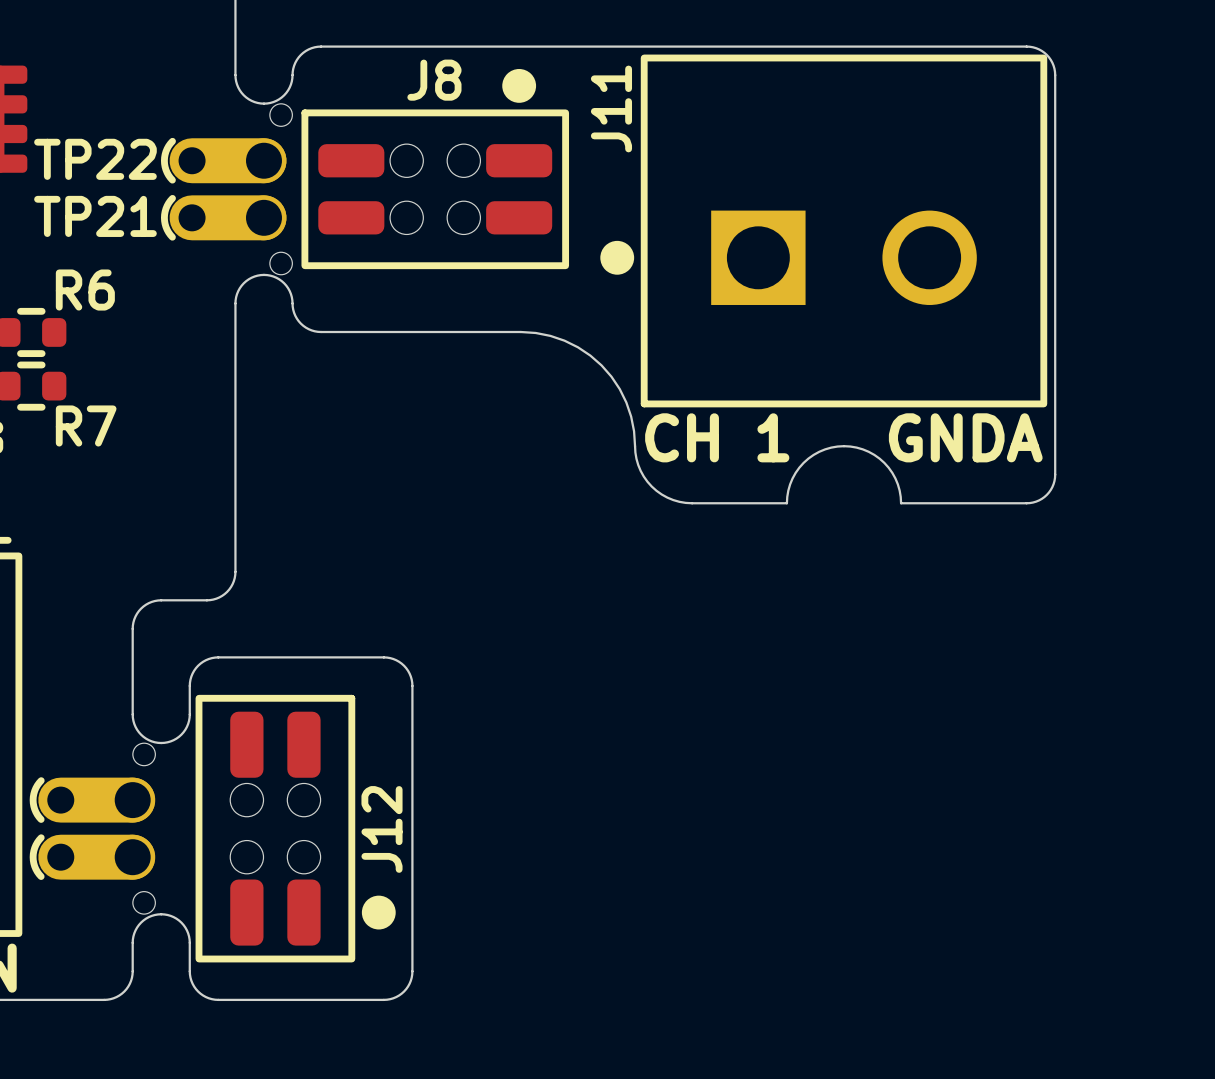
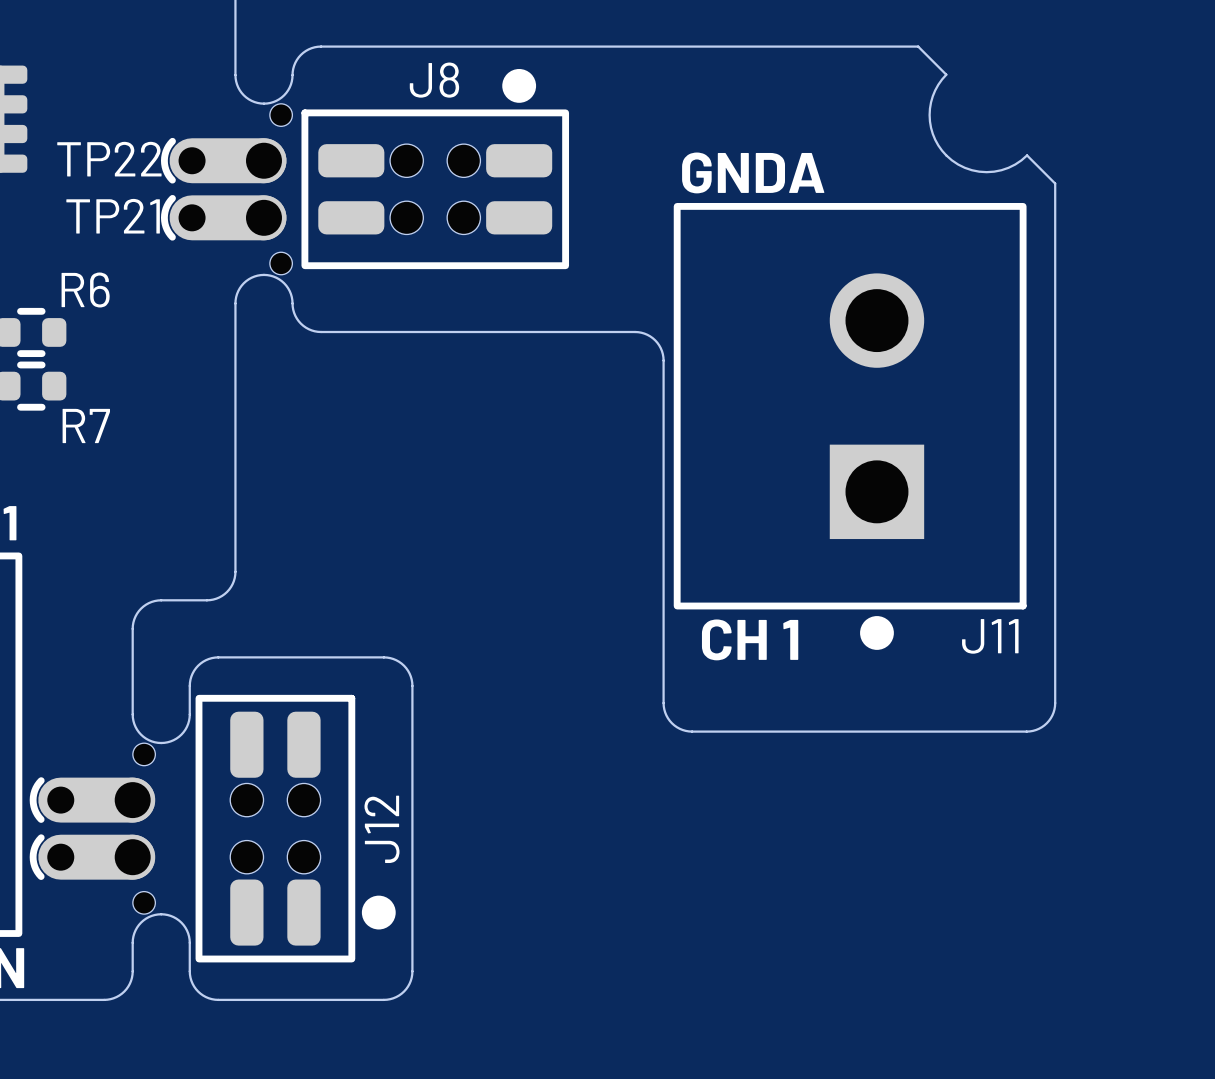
board edge: (918, 46) (1029, 46) (1039, 49) (1046, 54) (1052, 62) (1055, 71) (1055, 183) -> (918, 46) (946, 74) (935, 90) (929, 115) (932, 133) (946, 155) (964, 167) (986, 172) (1008, 167) (1027, 155) (1055, 183)
J11 name position: J11 (611, 108) -> J11 (990, 636)
J11 rotation: 0° (823, 230) -> 90° counterclockwise (850, 426)
board edge: (520, 332) (535, 332) (564, 340) (577, 347) (601, 365) (611, 376) (626, 402) (634, 431) (636, 458) (643, 476) (656, 490) (679, 501) (786, 503) (792, 478) (803, 462) (819, 451) (837, 446) (862, 449) (884, 462) (895, 478) (901, 503) (1033, 502) (1041, 498) (1048, 492) (1053, 484) (1055, 474) -> (520, 332) (638, 332) (652, 338) (661, 351) (663, 360) (663, 706) (666, 715) (671, 723) (685, 730) (1026, 731) (1041, 727) (1052, 715) (1055, 703) (1055, 474)
text position: CH 1 (717, 437) -> CH 1 (750, 639)
text position: GNDA (965, 437) -> GNDA (753, 172)

